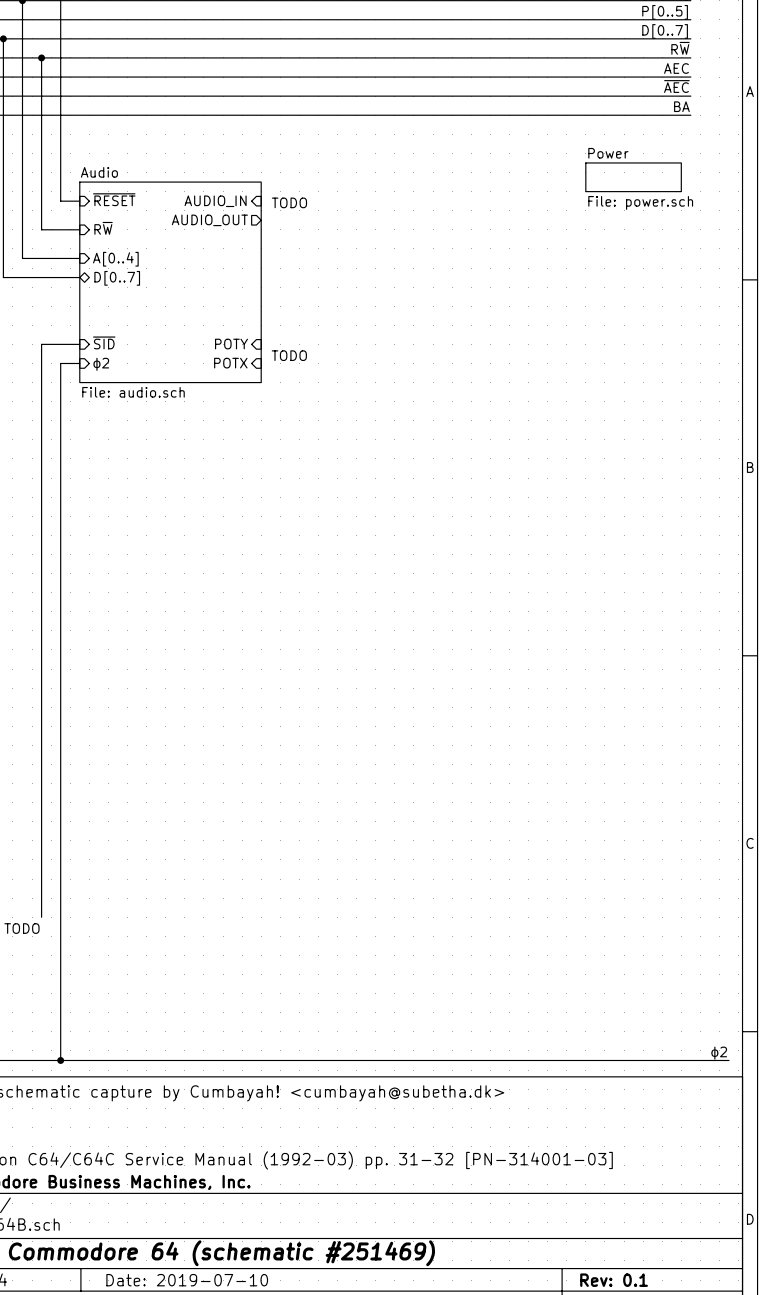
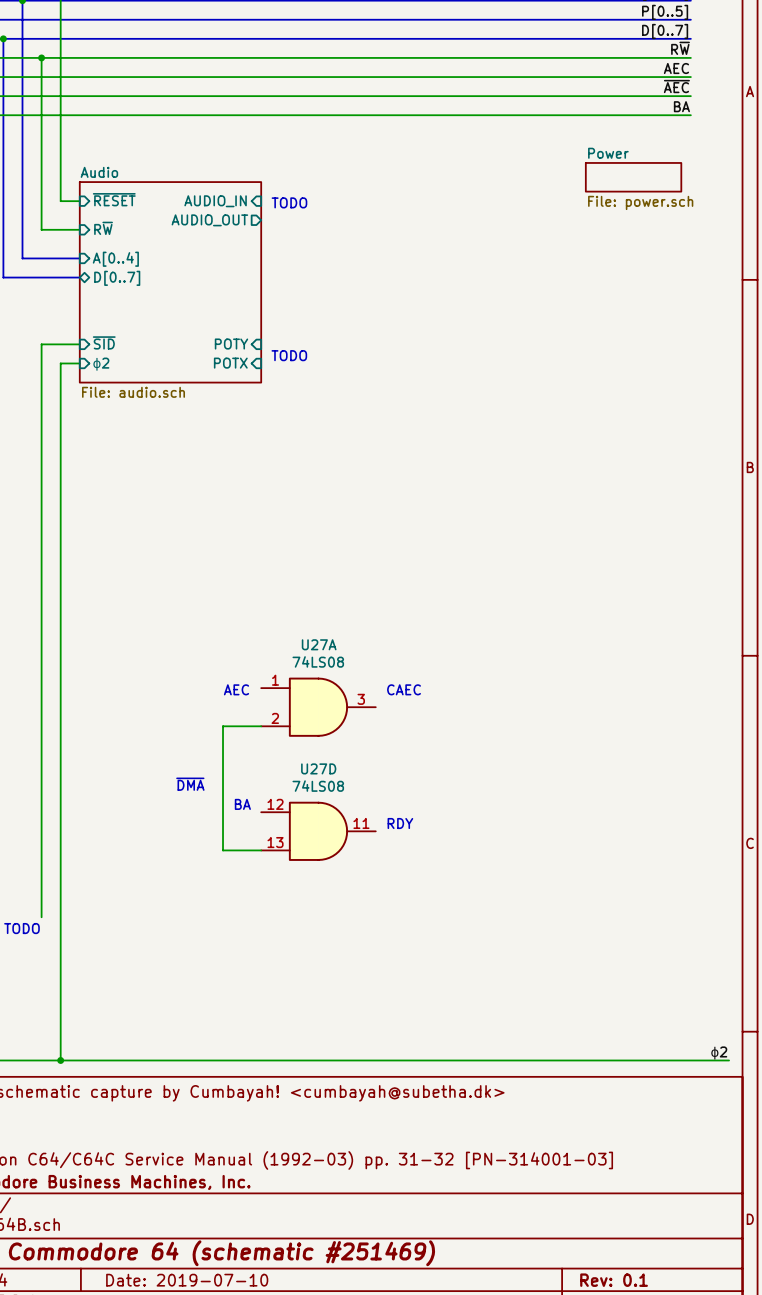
text: none -> AEC (236, 689)
text: none -> CAEC (404, 689)
U27A: none -> 74LS08 (318, 707)
wire: none -> (261, 726) (223, 726) (223, 850) (261, 850)
text: none -> ~{DMA} (190, 784)
text: none -> BA (242, 804)
text: none -> RDY (400, 823)
U27D: none -> 74LS08 (318, 831)

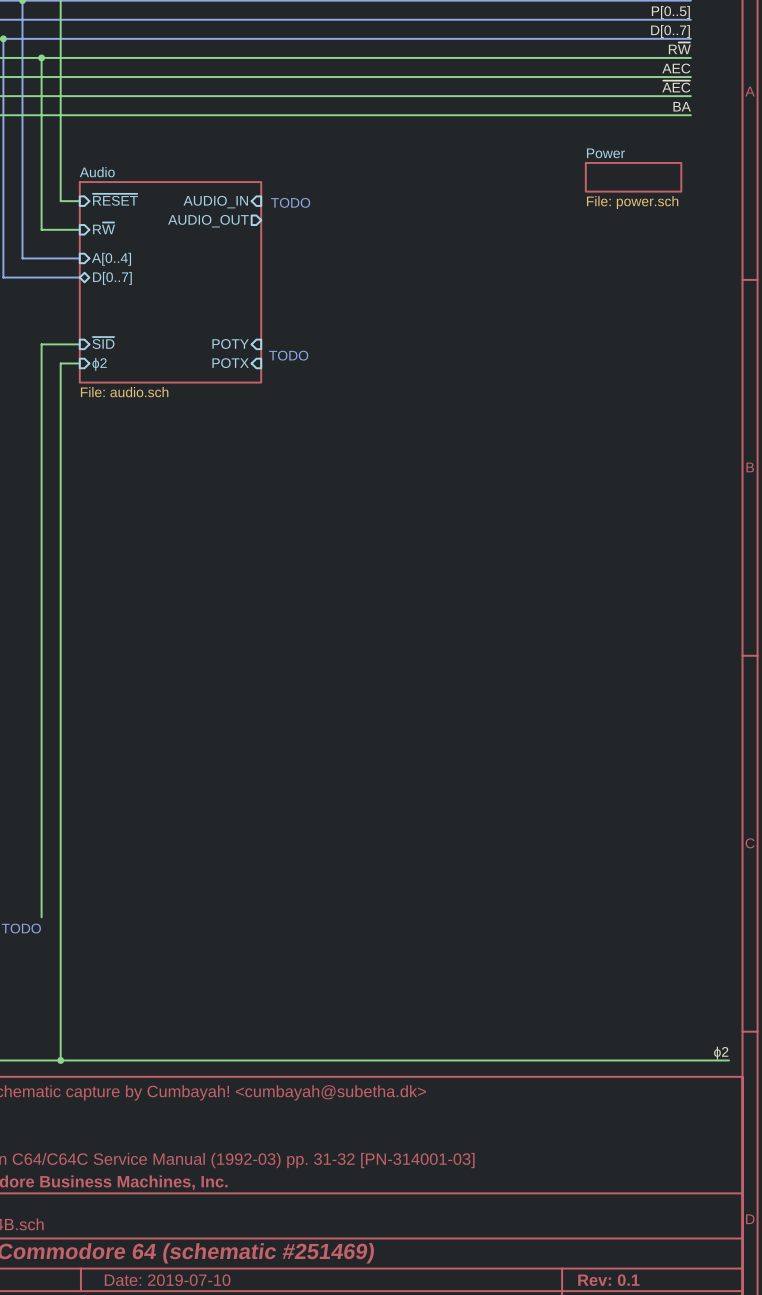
text: AEC (236, 689) -> none
text: CAEC (404, 689) -> none
U27A: 74LS08 (318, 707) -> none
wire: (261, 726) (223, 726) (223, 850) (261, 850) -> none
text: ~{DMA} (190, 784) -> none
text: BA (242, 804) -> none
text: RDY (400, 823) -> none
U27D: 74LS08 (318, 831) -> none

